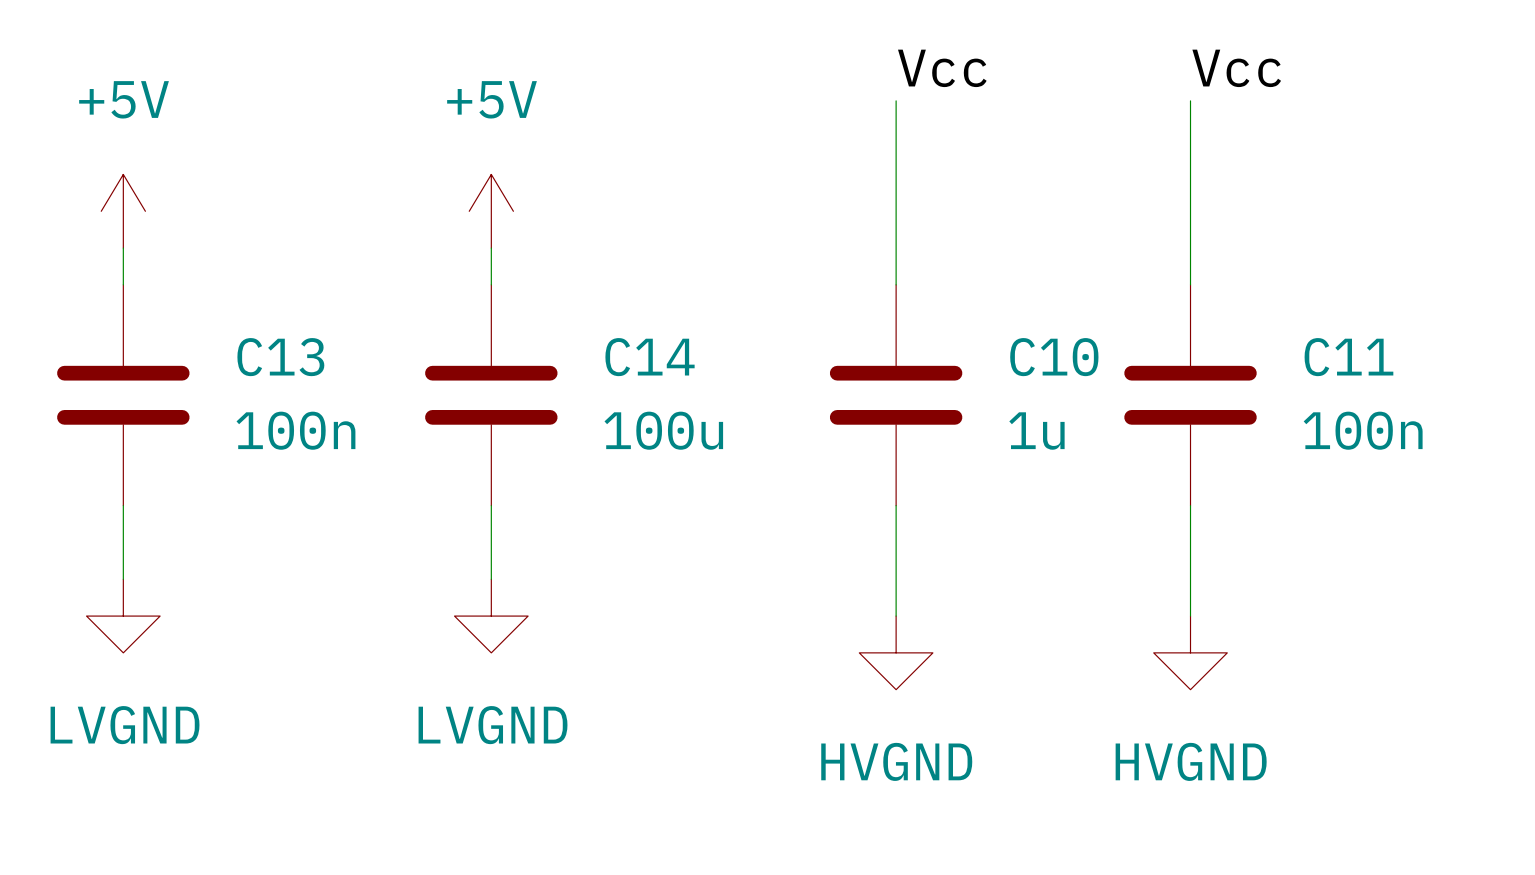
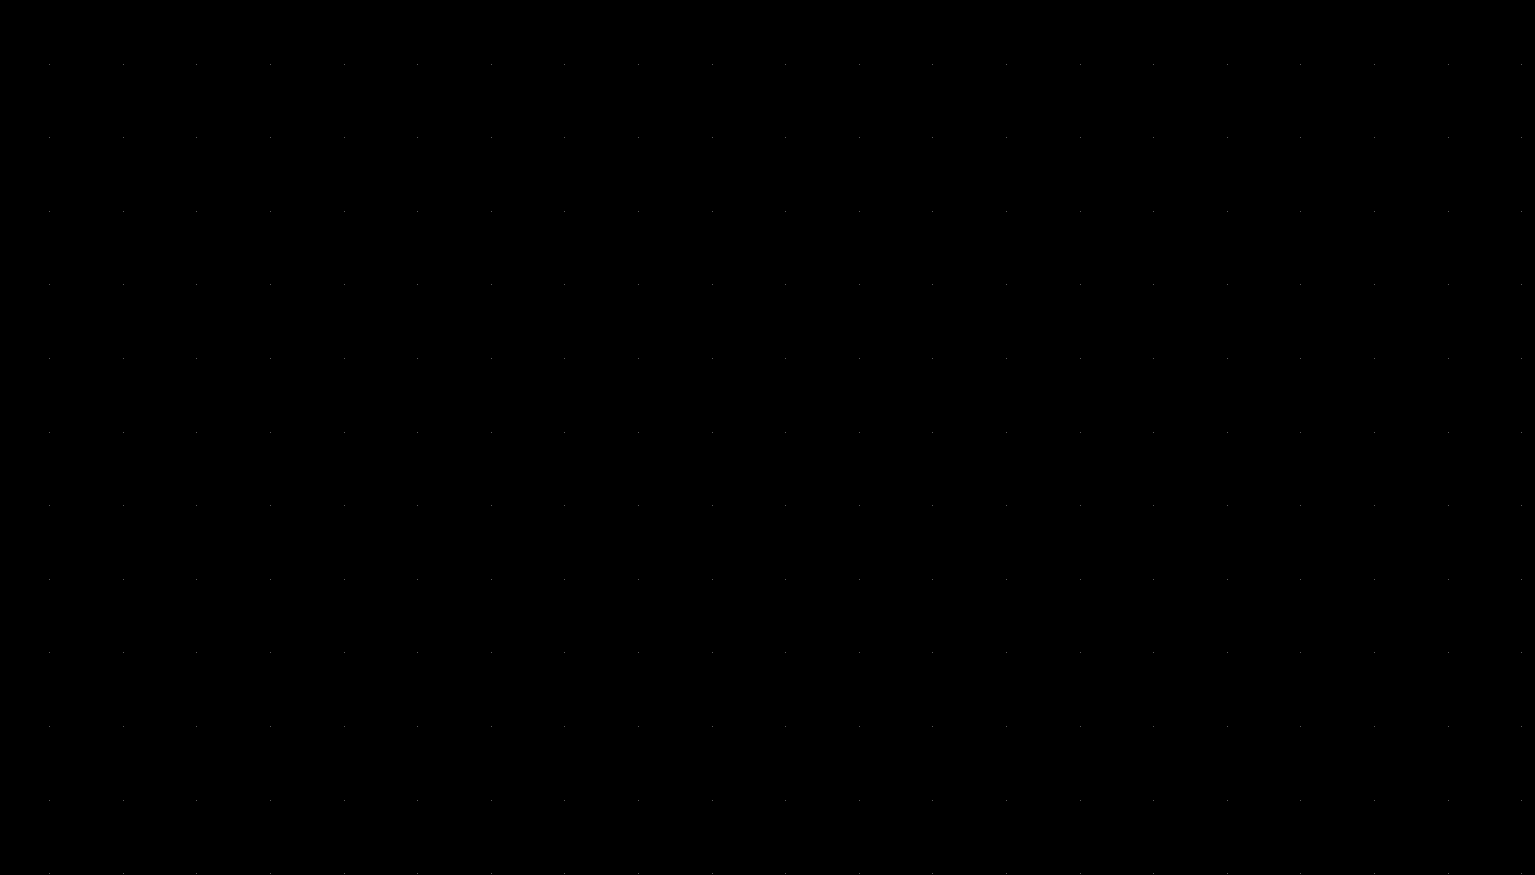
label: Vcc (942, 68) -> none
label: Vcc (1236, 68) -> none
wire: (896, 100) (896, 284) -> none
wire: (1190, 100) (1190, 284) -> none
power symbol: +5V (123, 211) -> none
power symbol: +5V (491, 211) -> none
wire: (123, 248) (123, 284) -> none
wire: (491, 248) (491, 284) -> none
C13: 100n (123, 395) -> none
C14: 100u (491, 395) -> none
C10: 1u (896, 395) -> none
C11: 100n (1190, 395) -> none
wire: (123, 505) (123, 579) -> none
wire: (491, 505) (491, 579) -> none
wire: (896, 505) (896, 616) -> none
wire: (1190, 505) (1190, 616) -> none
power symbol: LVGND (123, 616) -> none
power symbol: LVGND (491, 616) -> none
power symbol: HVGND (896, 652) -> none
power symbol: HVGND (1190, 652) -> none

